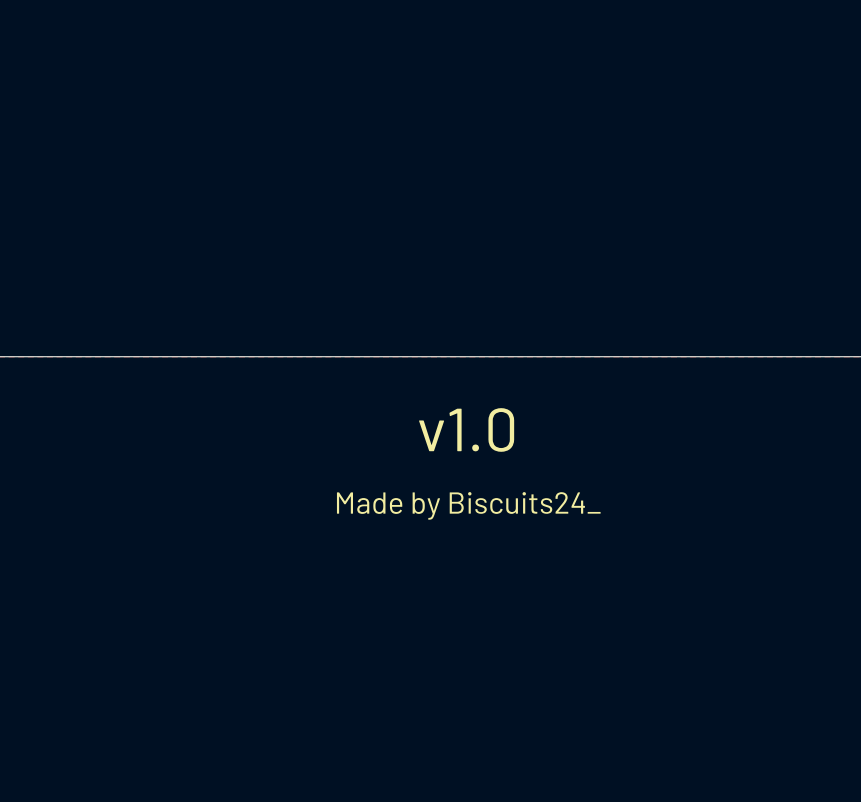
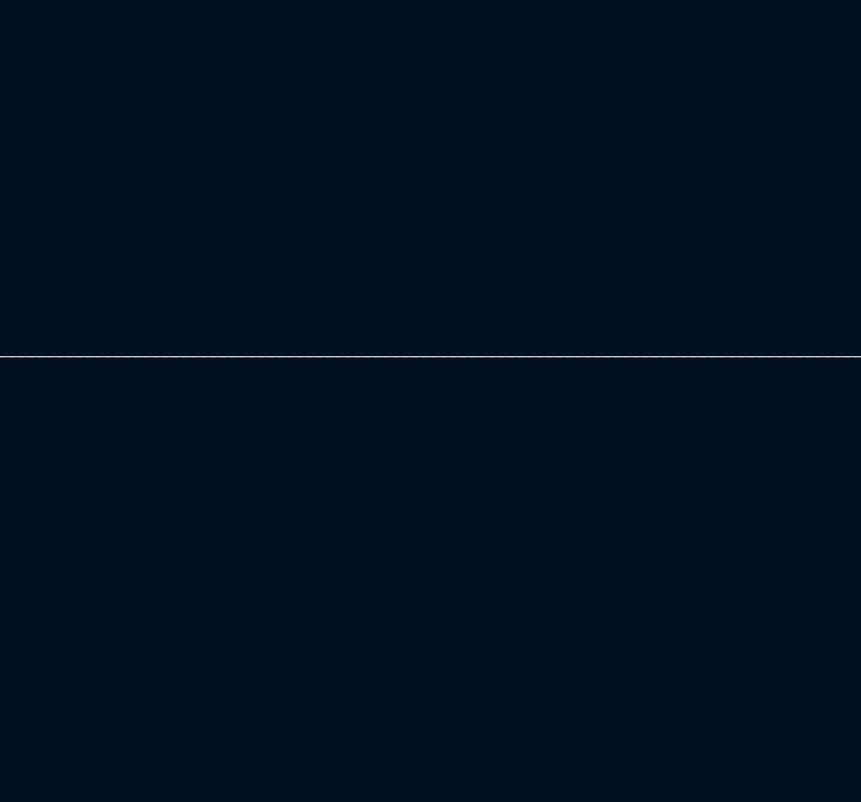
text: v1.0 (466, 429) -> none
text: Made by Biscuits24_ (468, 505) -> none

